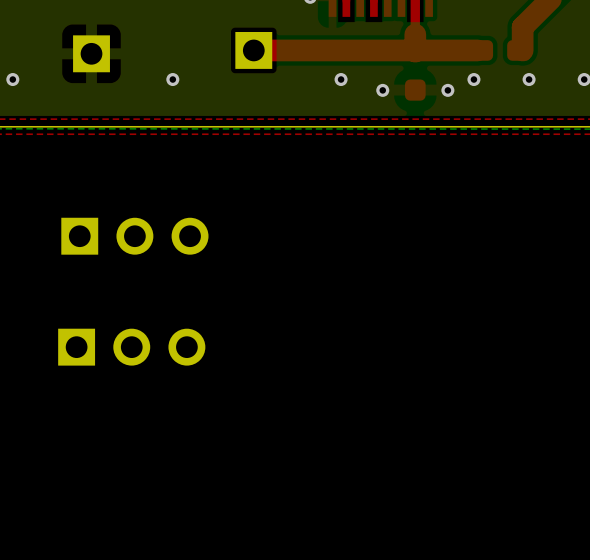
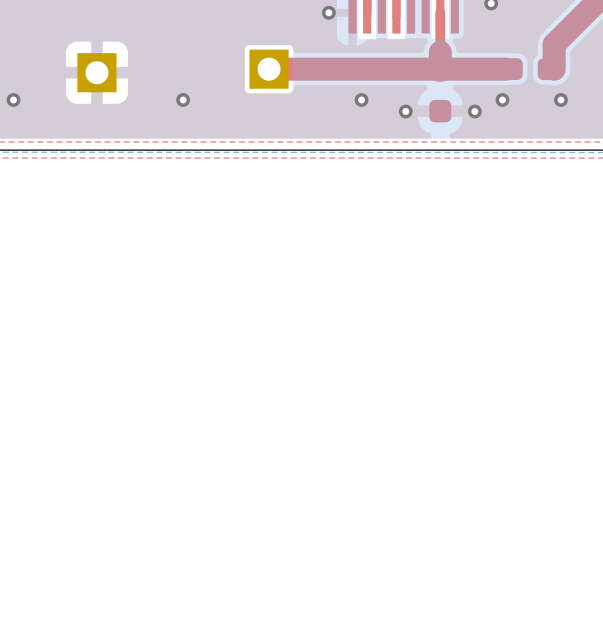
part: (134, 236) -> none
part: (131, 347) -> none

